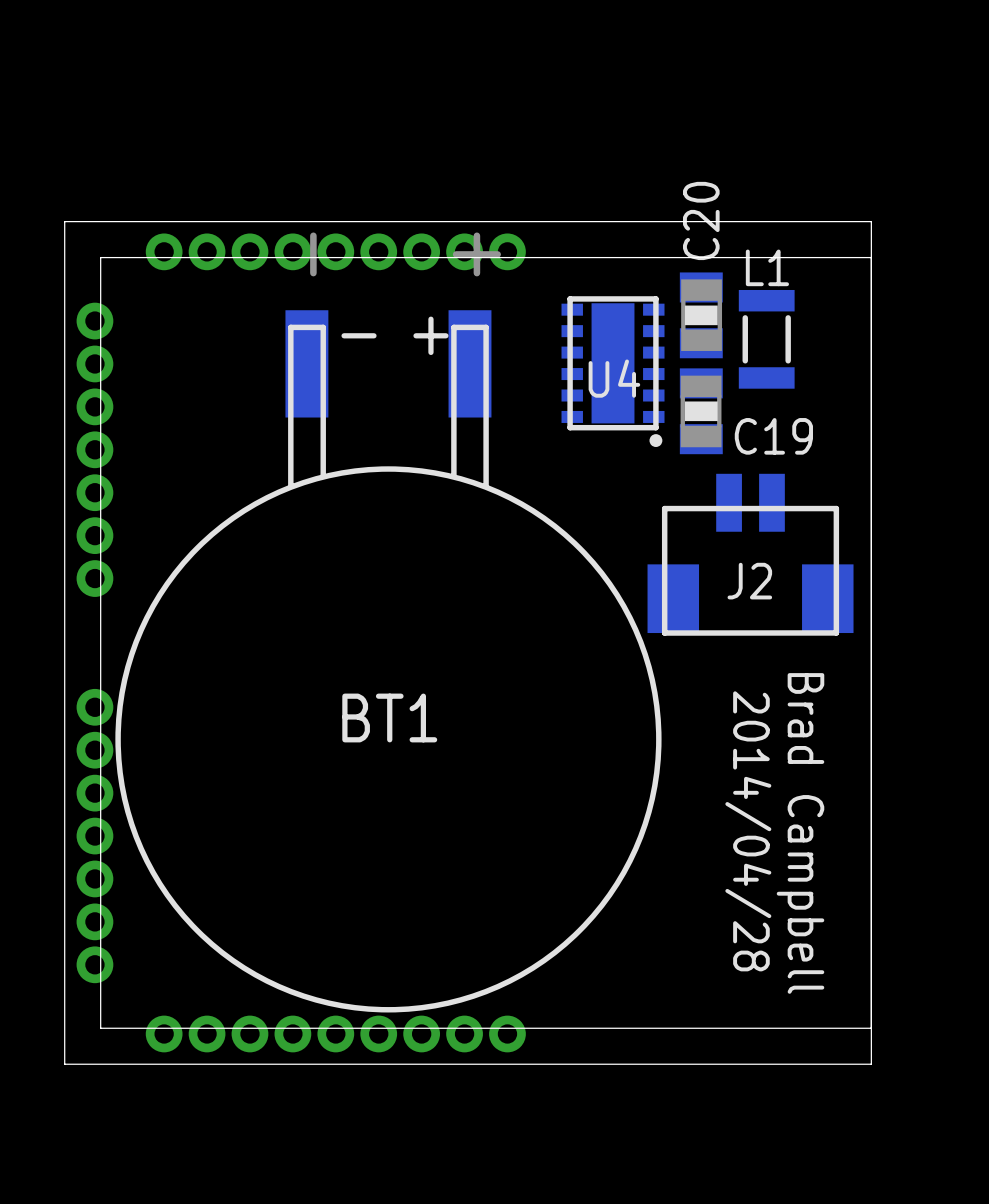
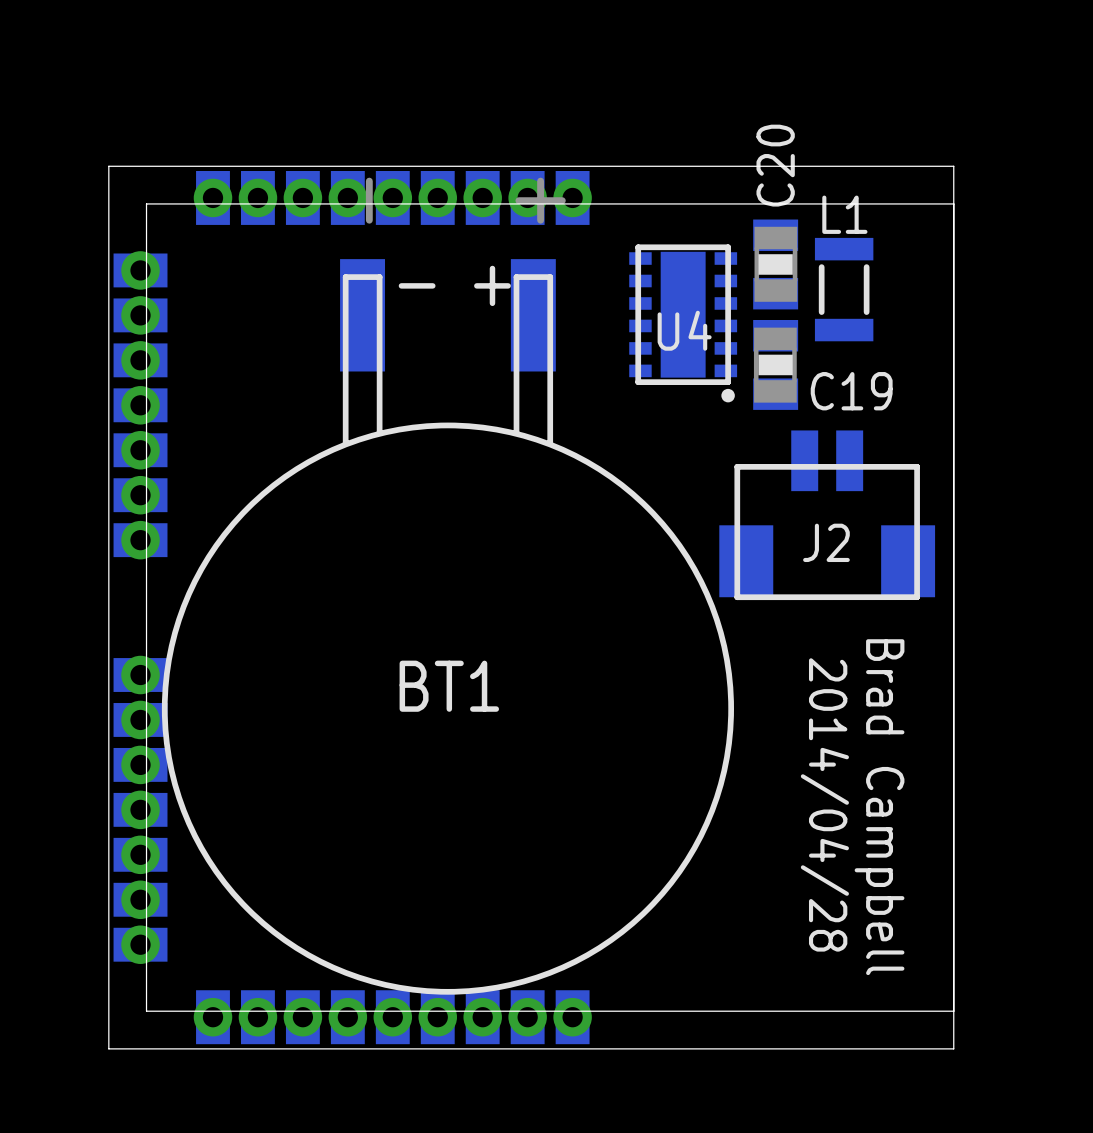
part footprint: [76, 233, 526, 1053] -> [113, 170, 592, 1045]

